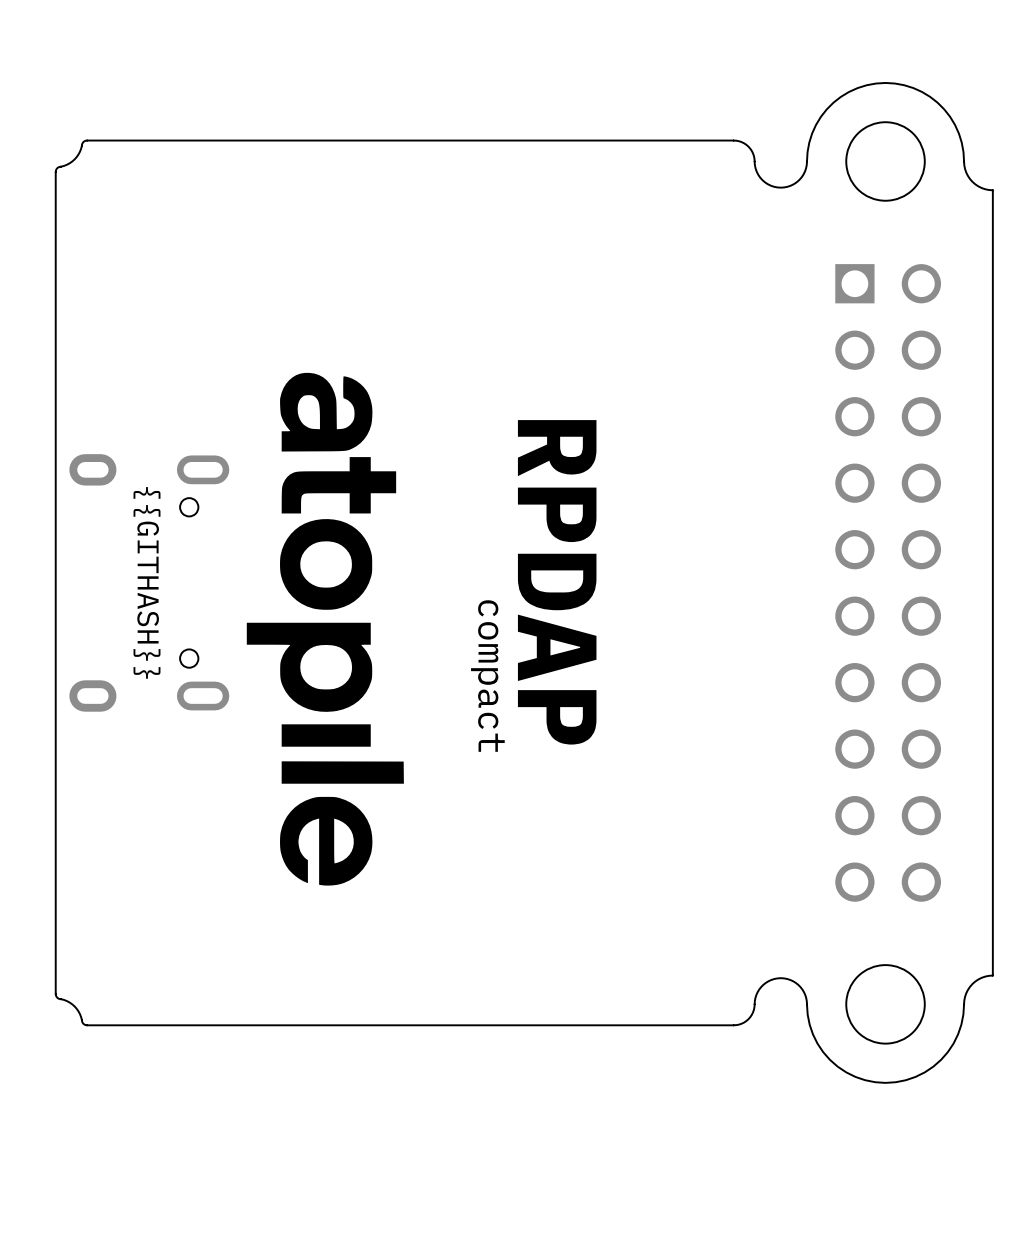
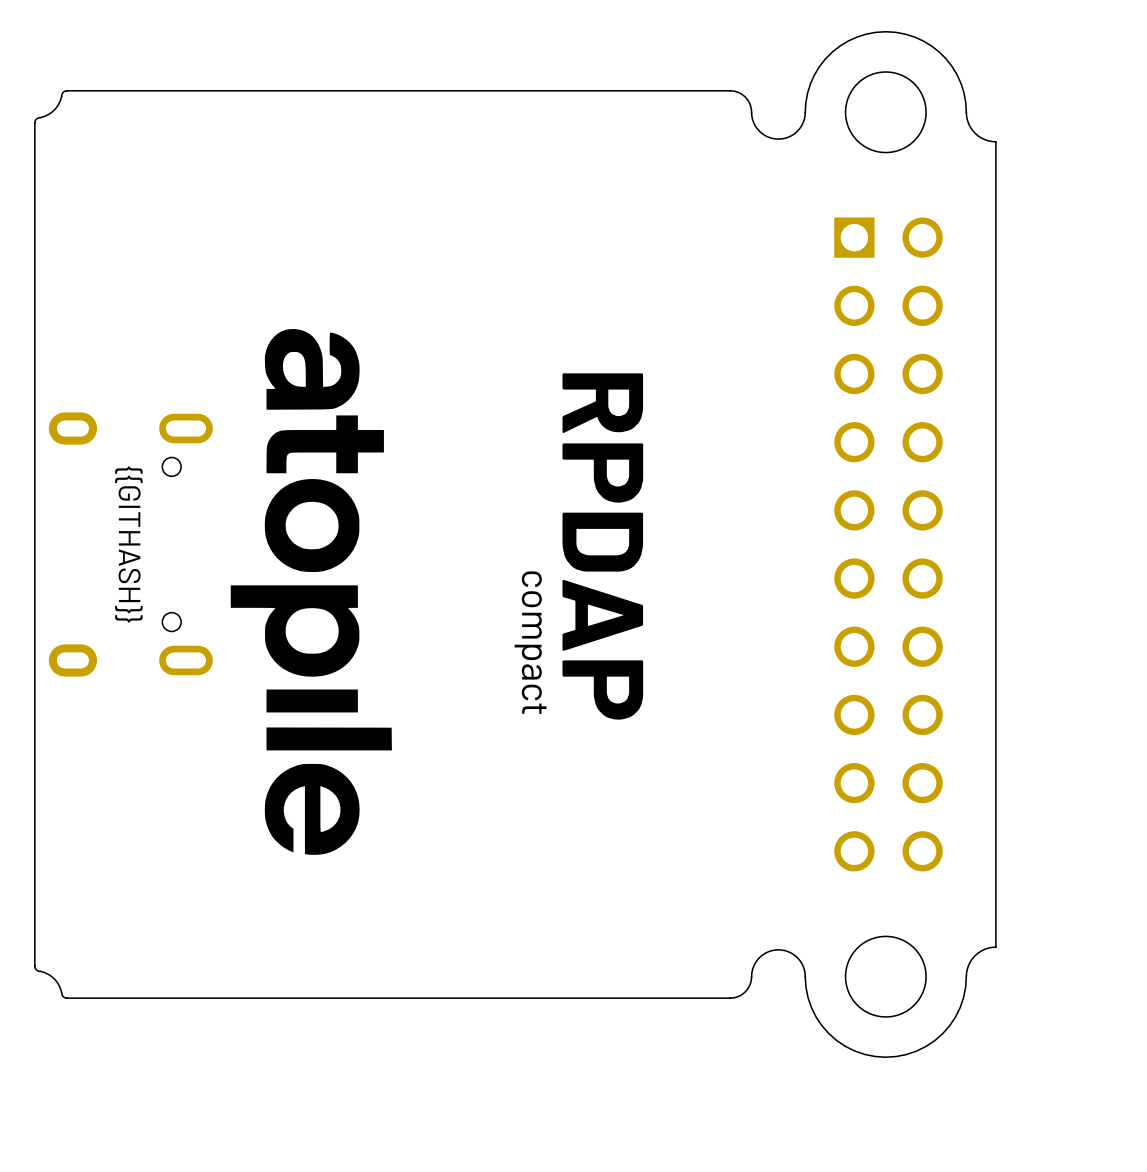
text position: RPDAP (557, 582) -> RPDAP (602, 546)
text position: compact (487, 676) -> compact (530, 642)

